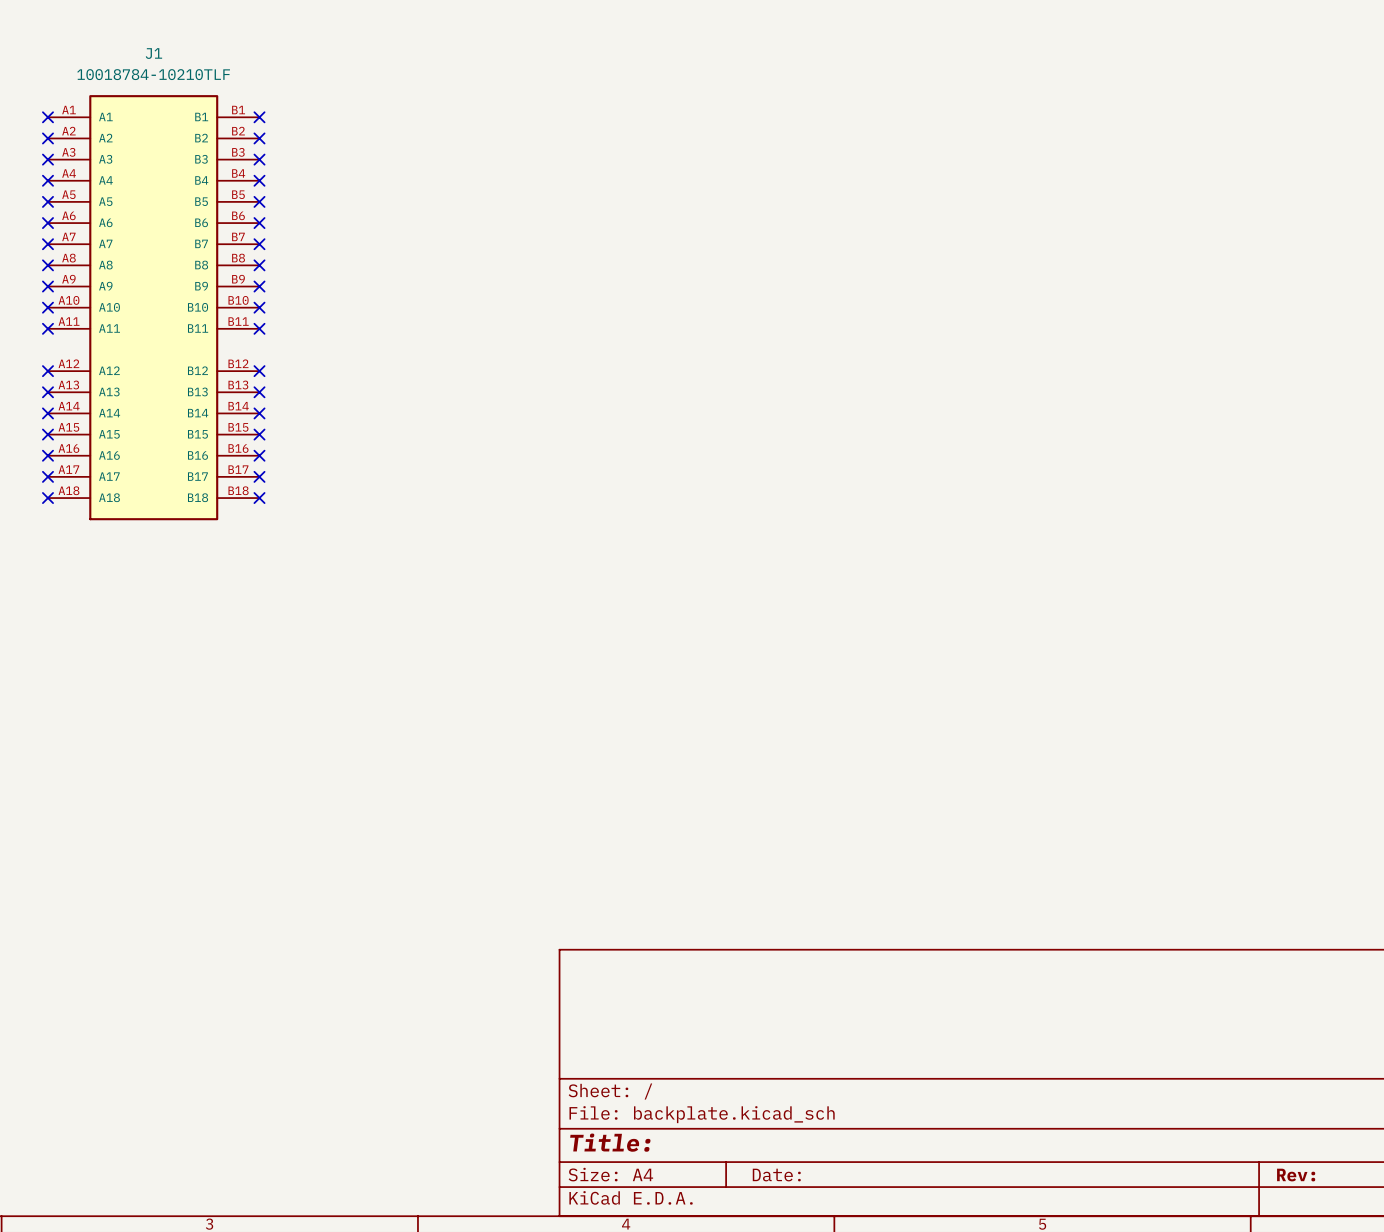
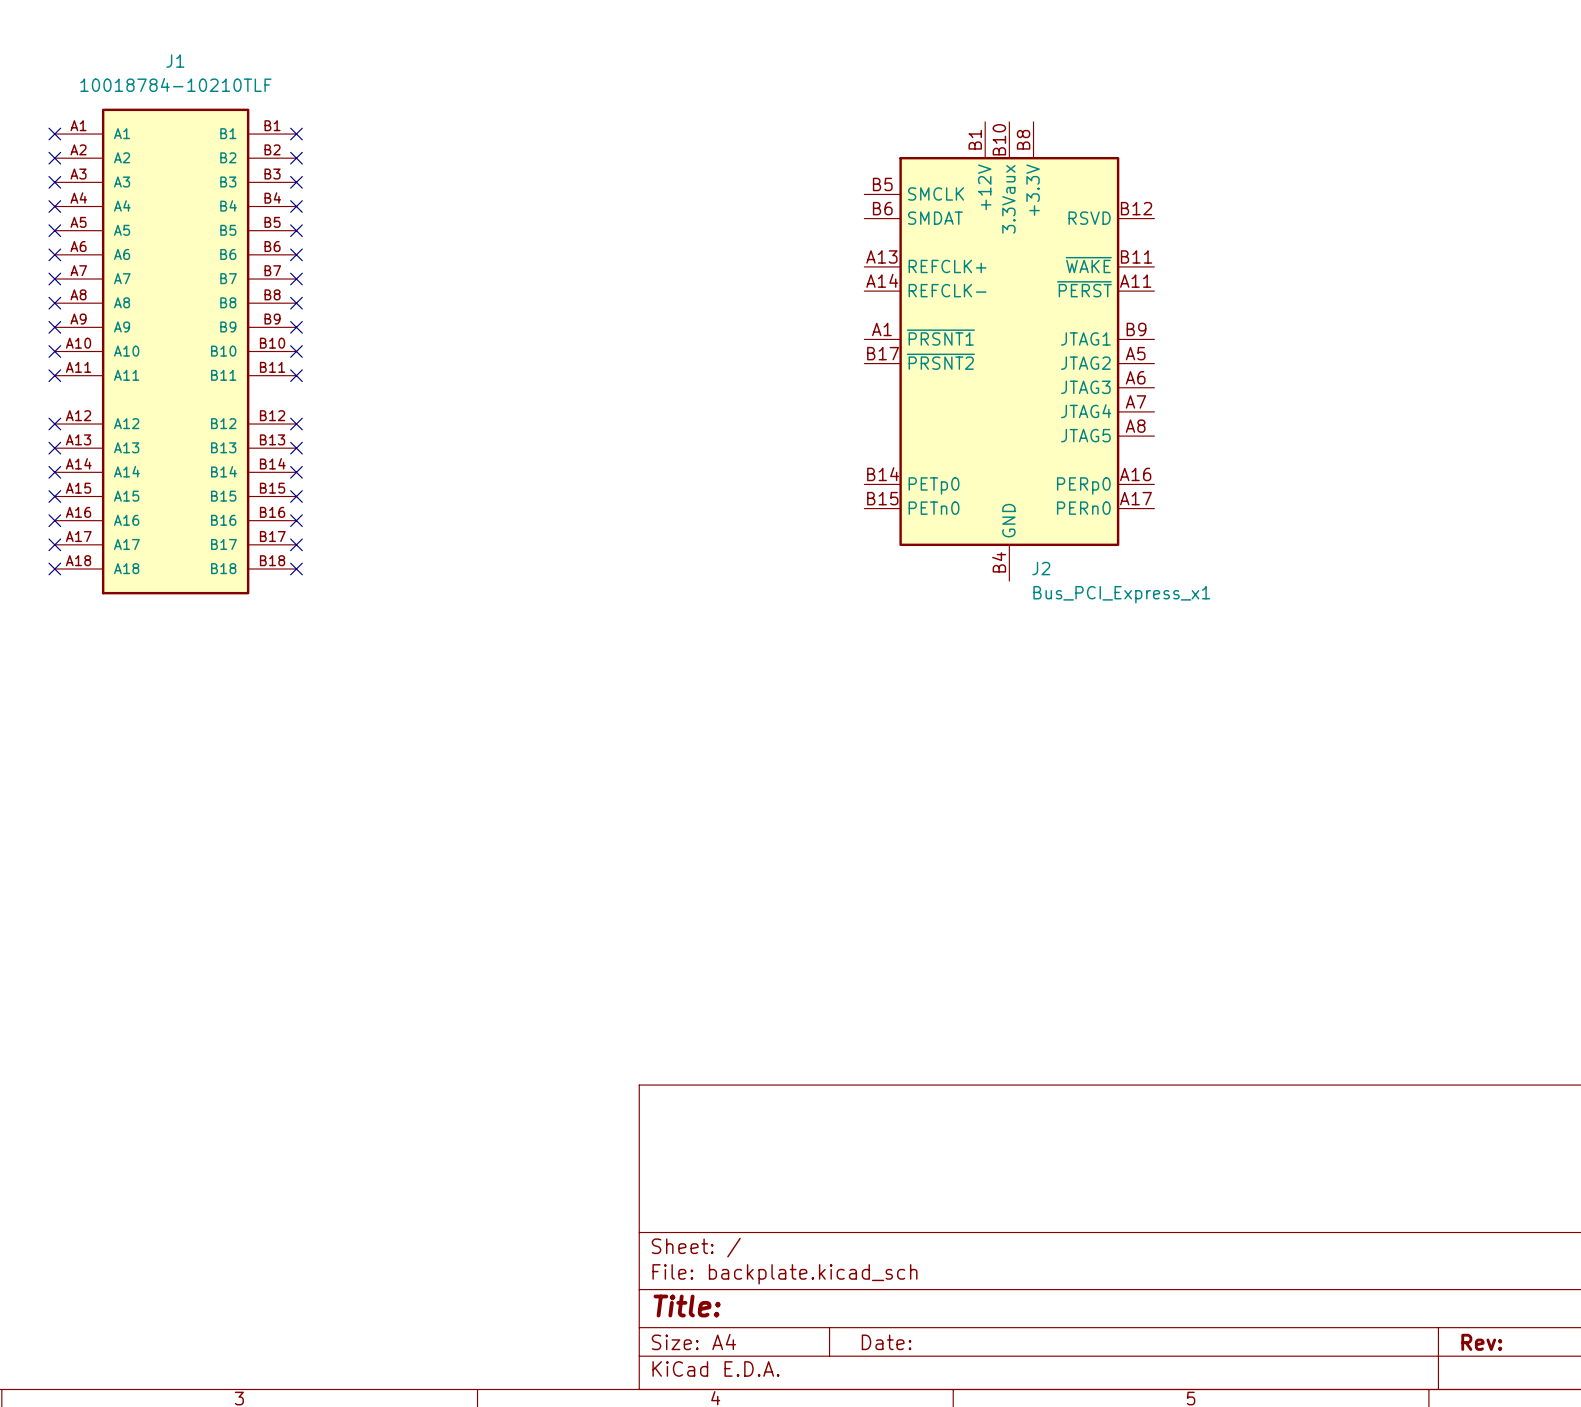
J2: none -> Bus_PCI_Express_x1 (1009, 351)

